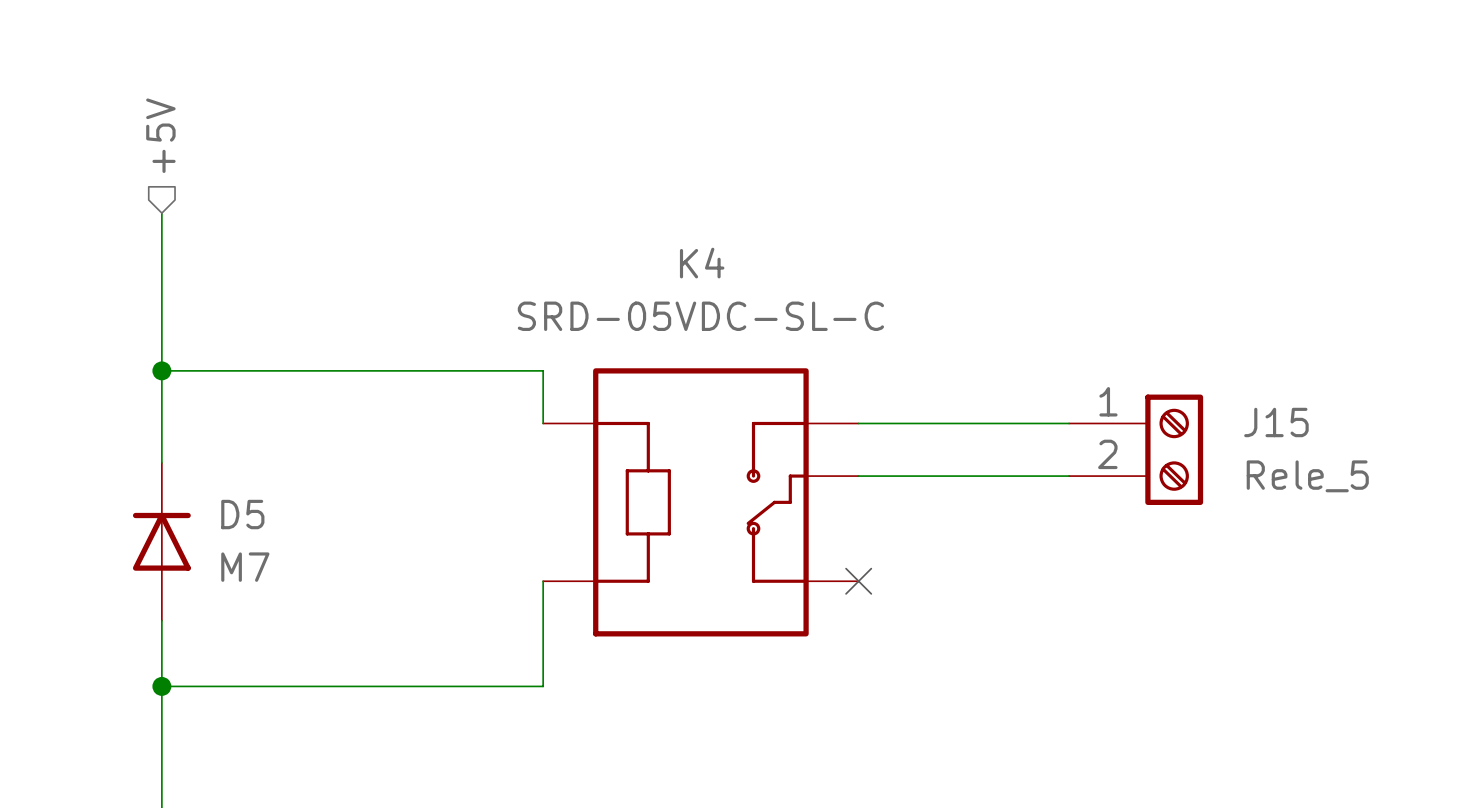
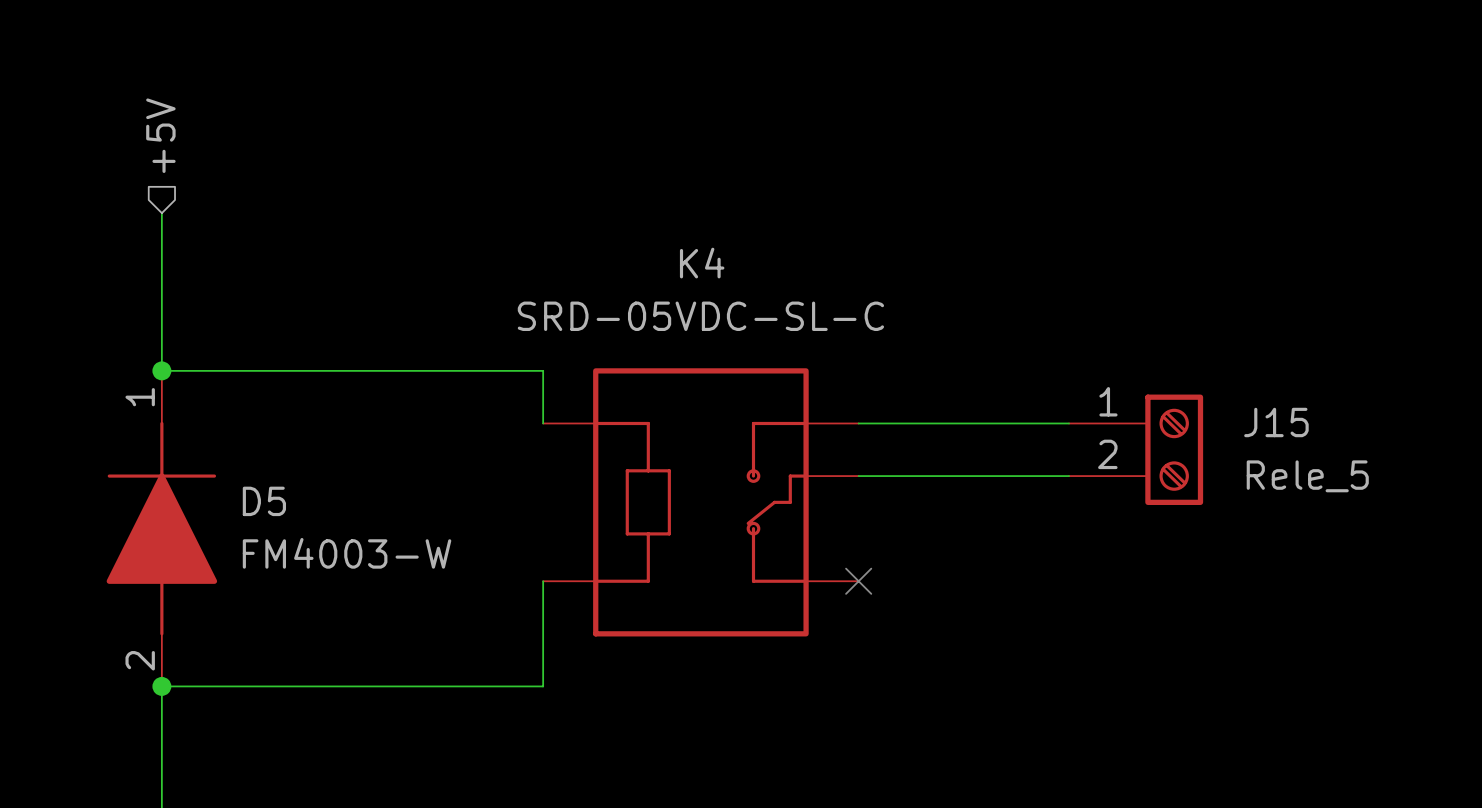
D5 symbol: [132, 462, 191, 621] -> [106, 370, 218, 687]
D5 value: M7 (245, 567) -> FM4003-W (347, 553)

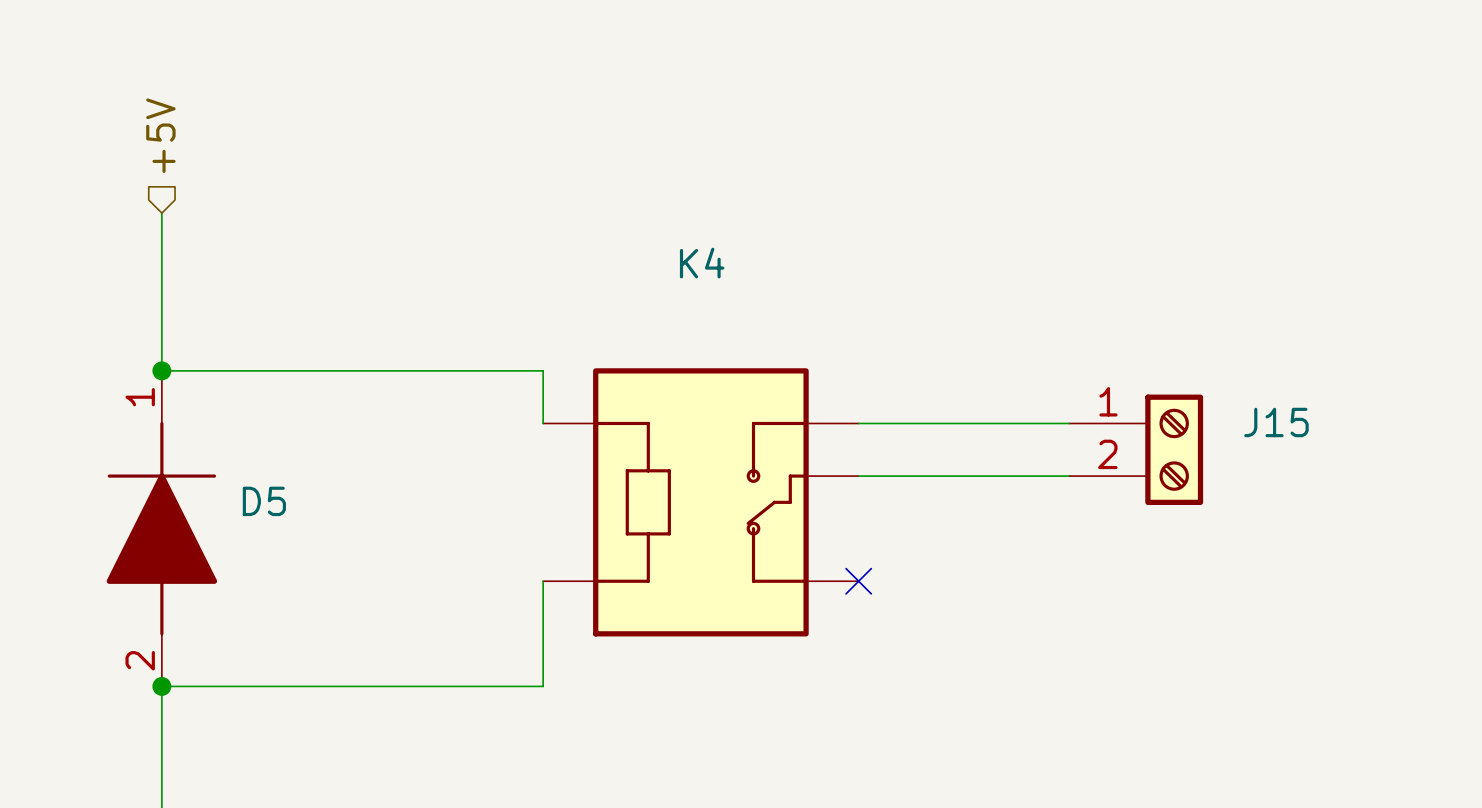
K4 value: SRD-05VDC-SL-C (700, 316) -> none
J15 value: Rele_5 (1307, 476) -> none
D5 value: FM4003-W (347, 553) -> none

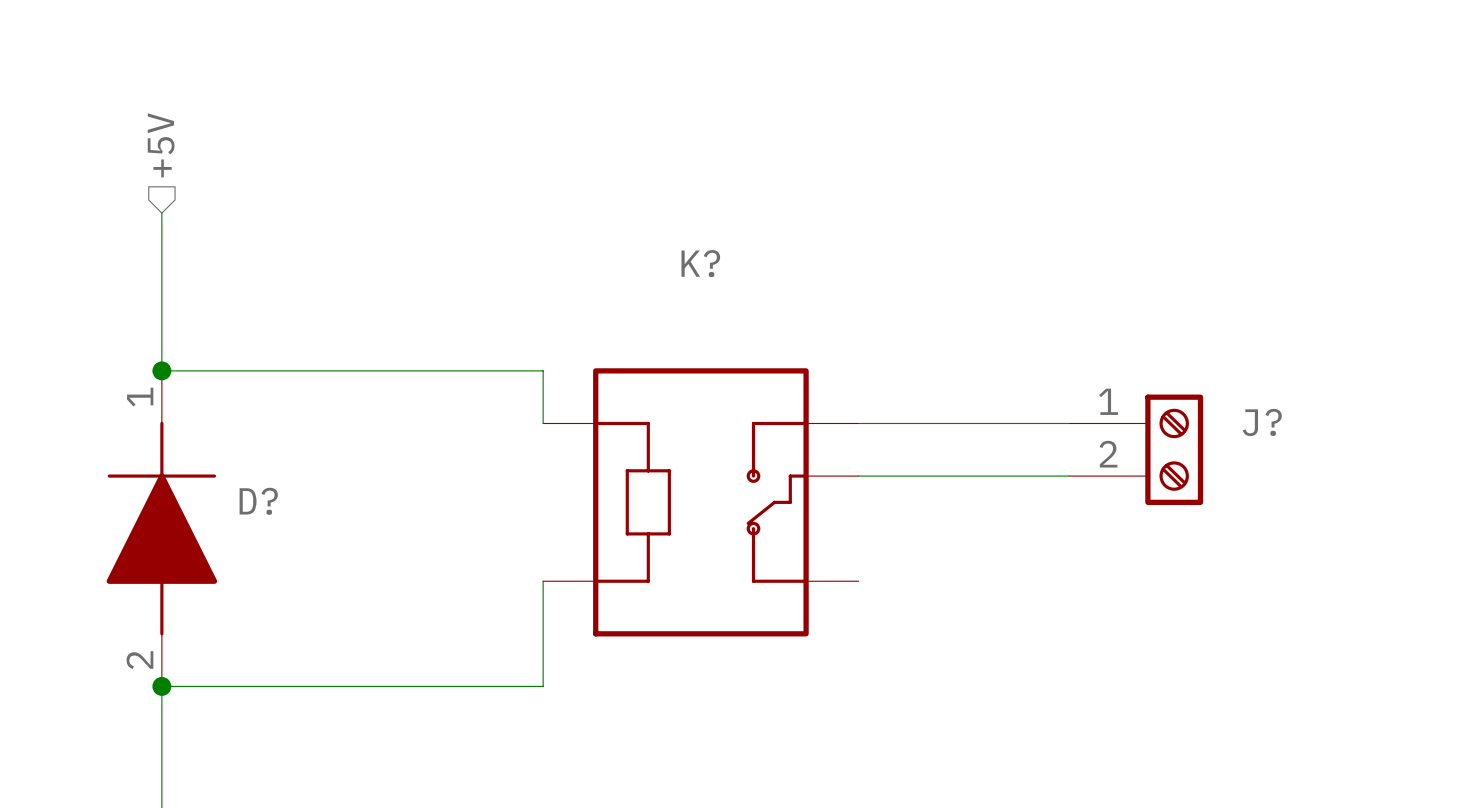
K4 name: K4 (702, 263) -> K? (700, 263)
J15 name: J15 (1276, 422) -> J? (1262, 422)
D5 name: D5 (264, 501) -> D? (258, 501)
no-connect mark: (858, 581) -> none

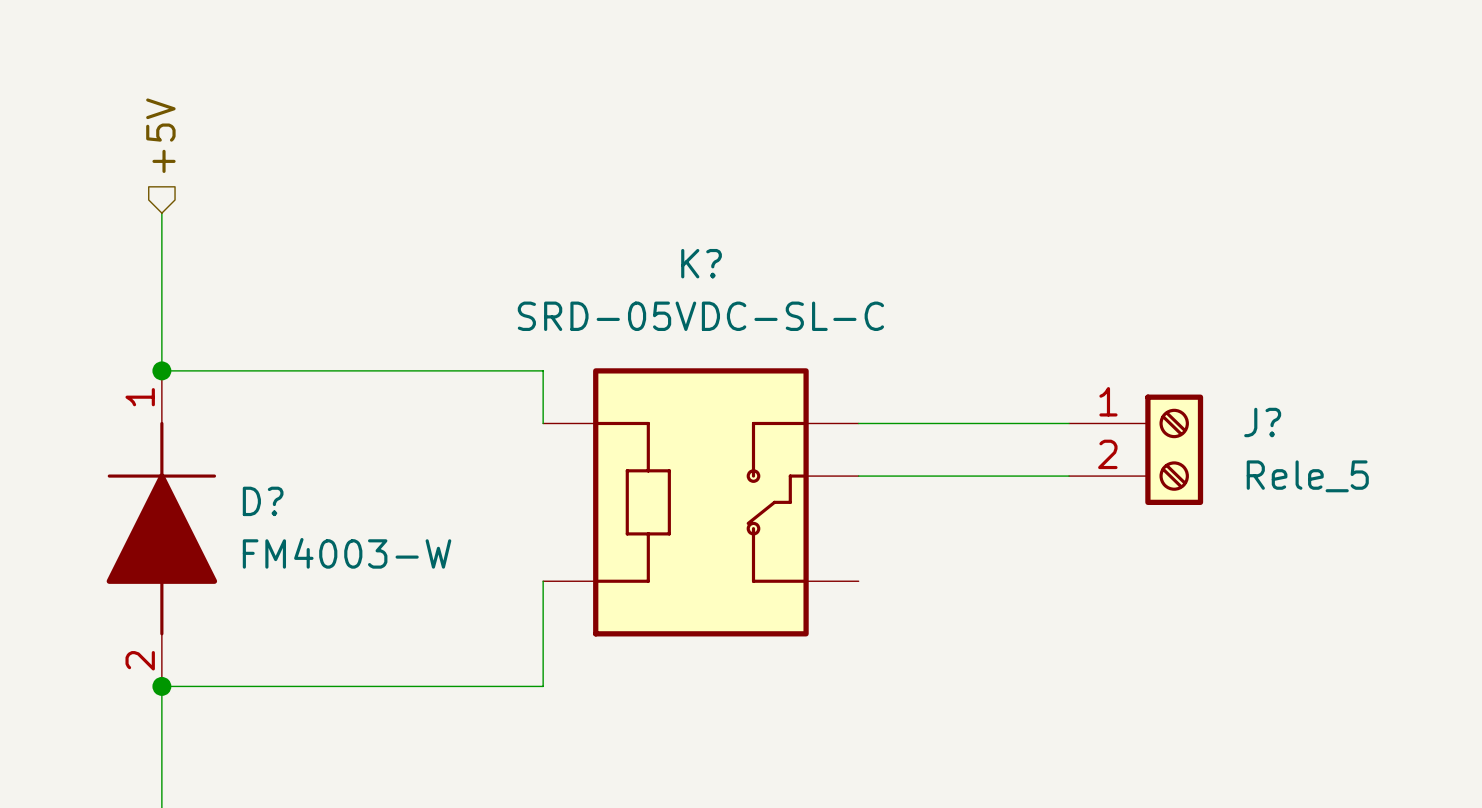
K? value: none -> SRD-05VDC-SL-C (700, 316)
J? value: none -> Rele_5 (1307, 476)
D? value: none -> FM4003-W (347, 553)

